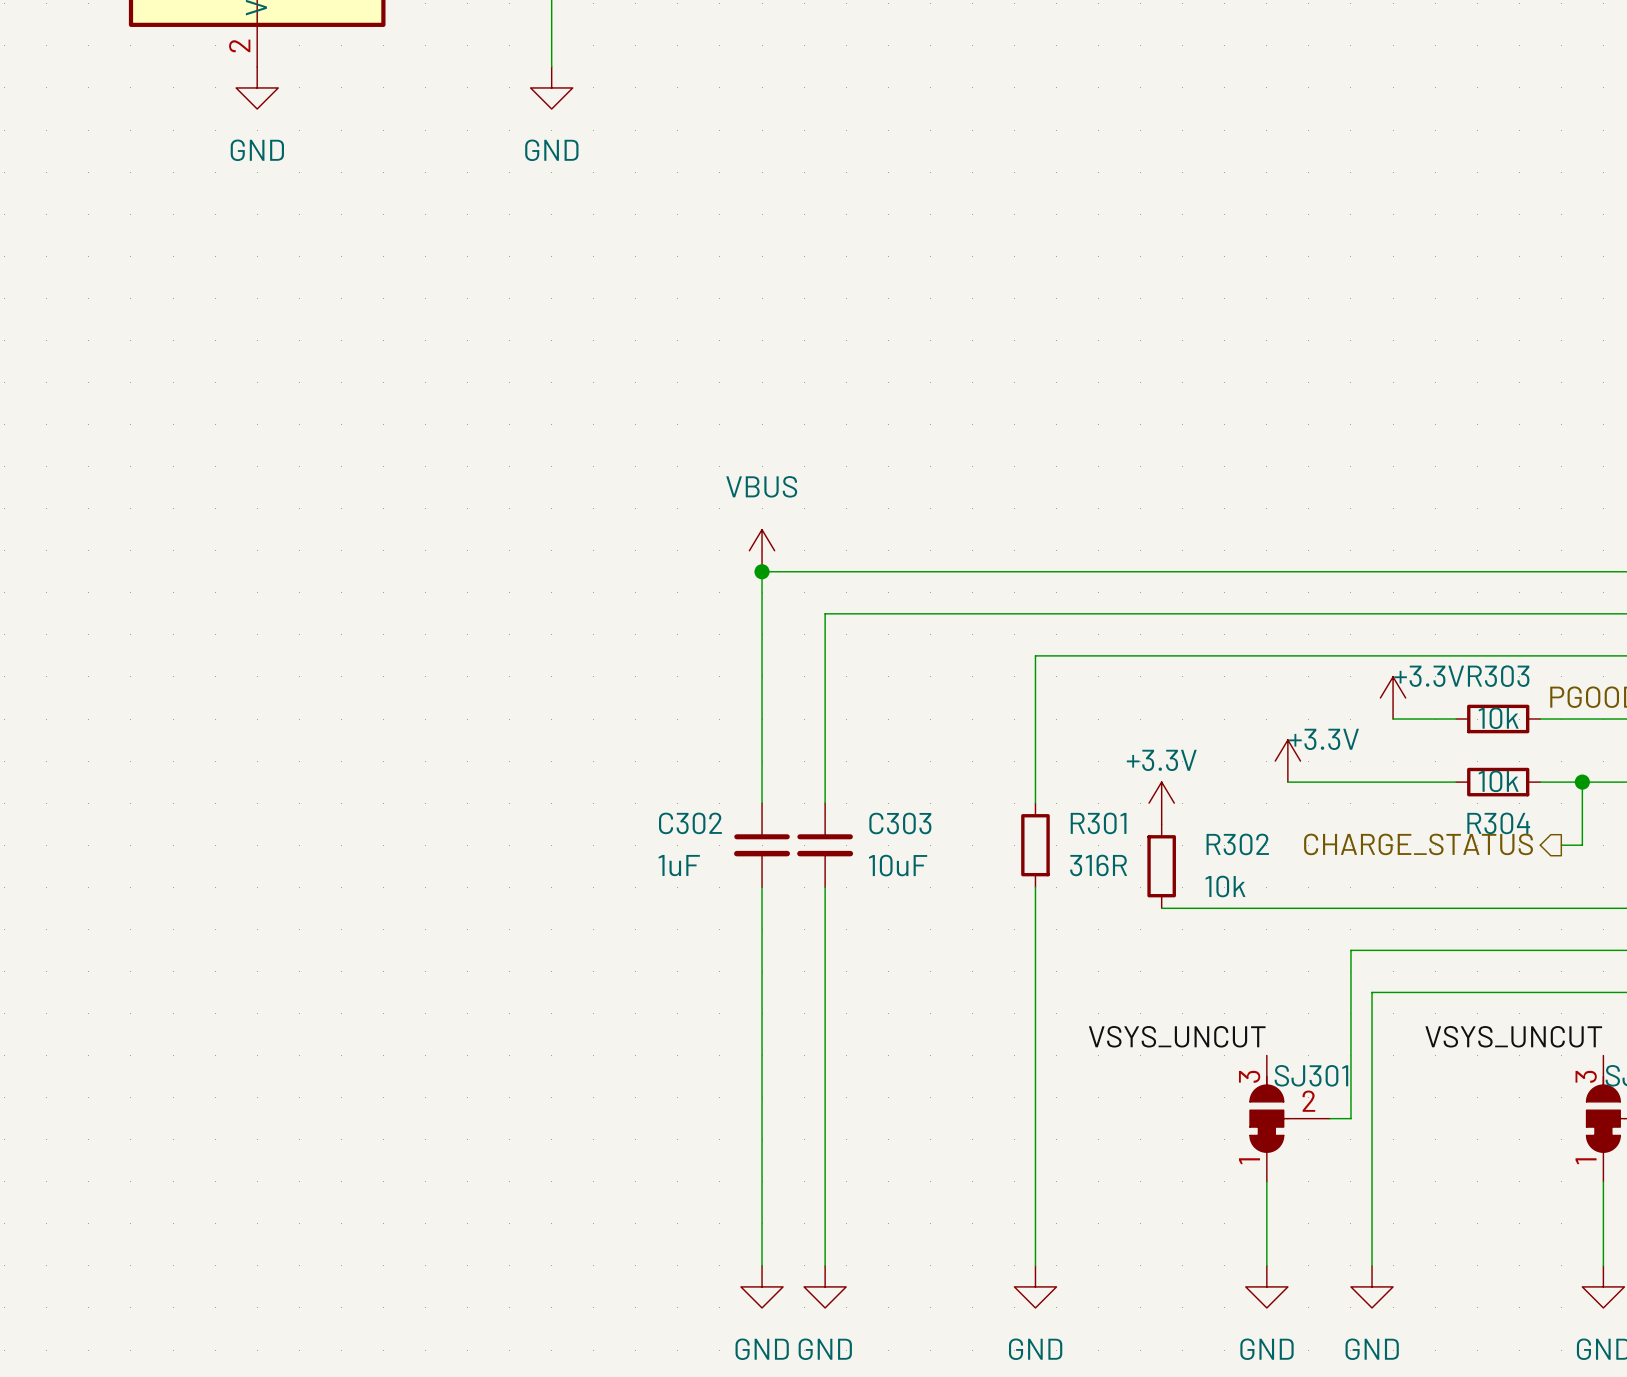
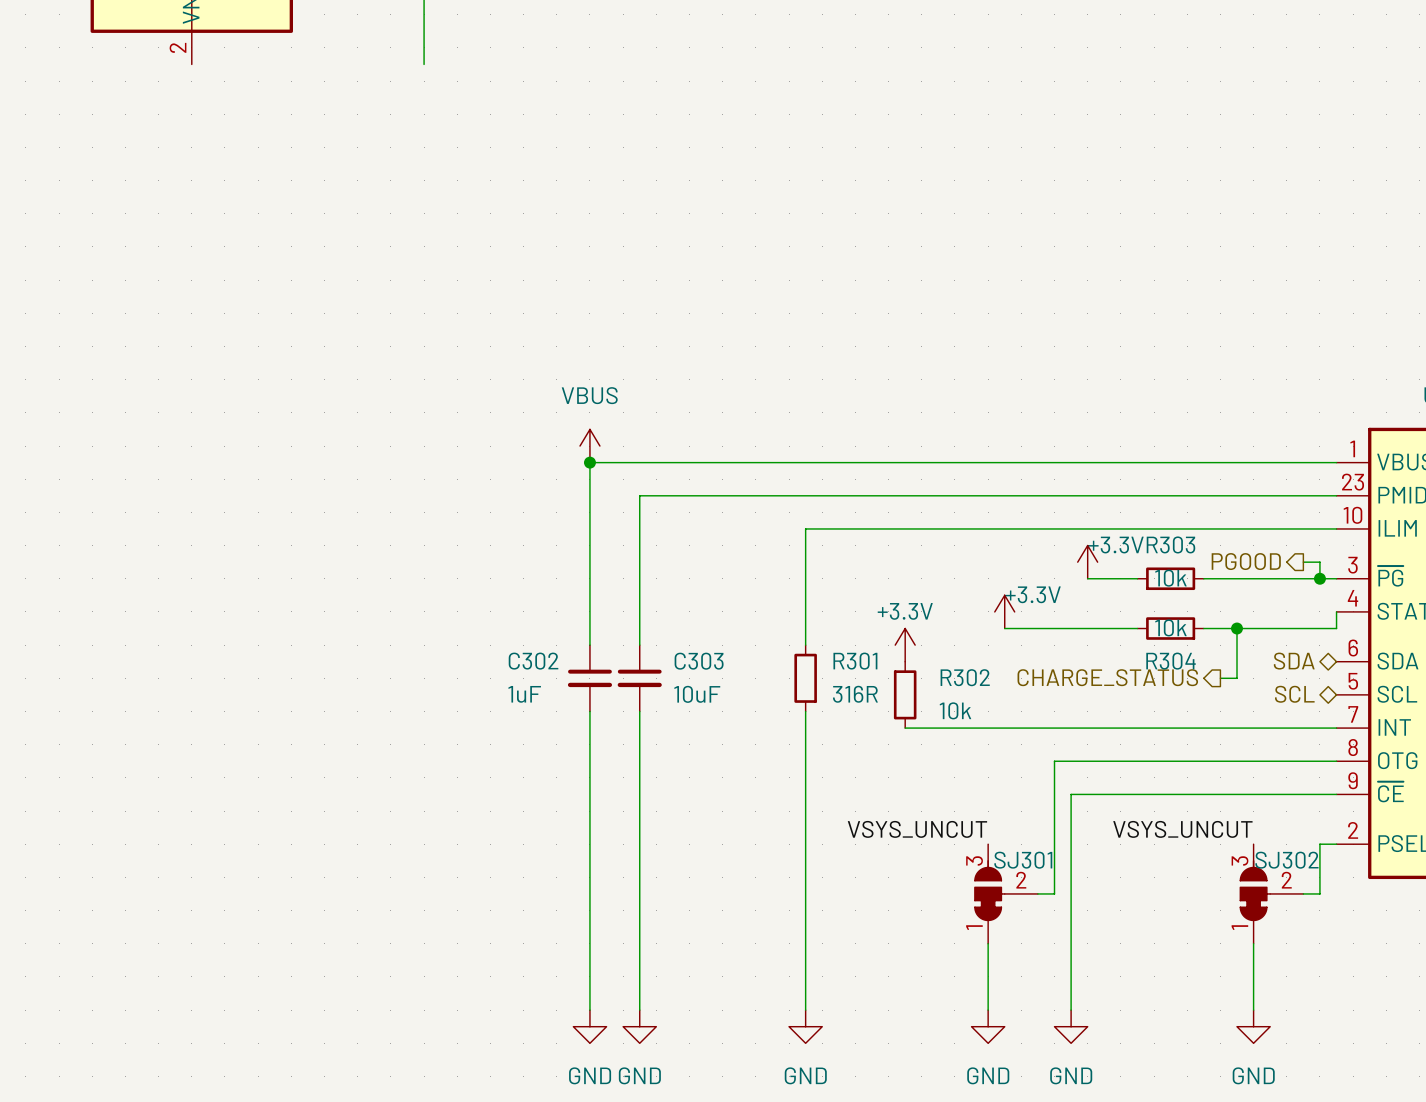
power symbol: GND (257, 87) -> none
power symbol: GND (551, 87) -> none

